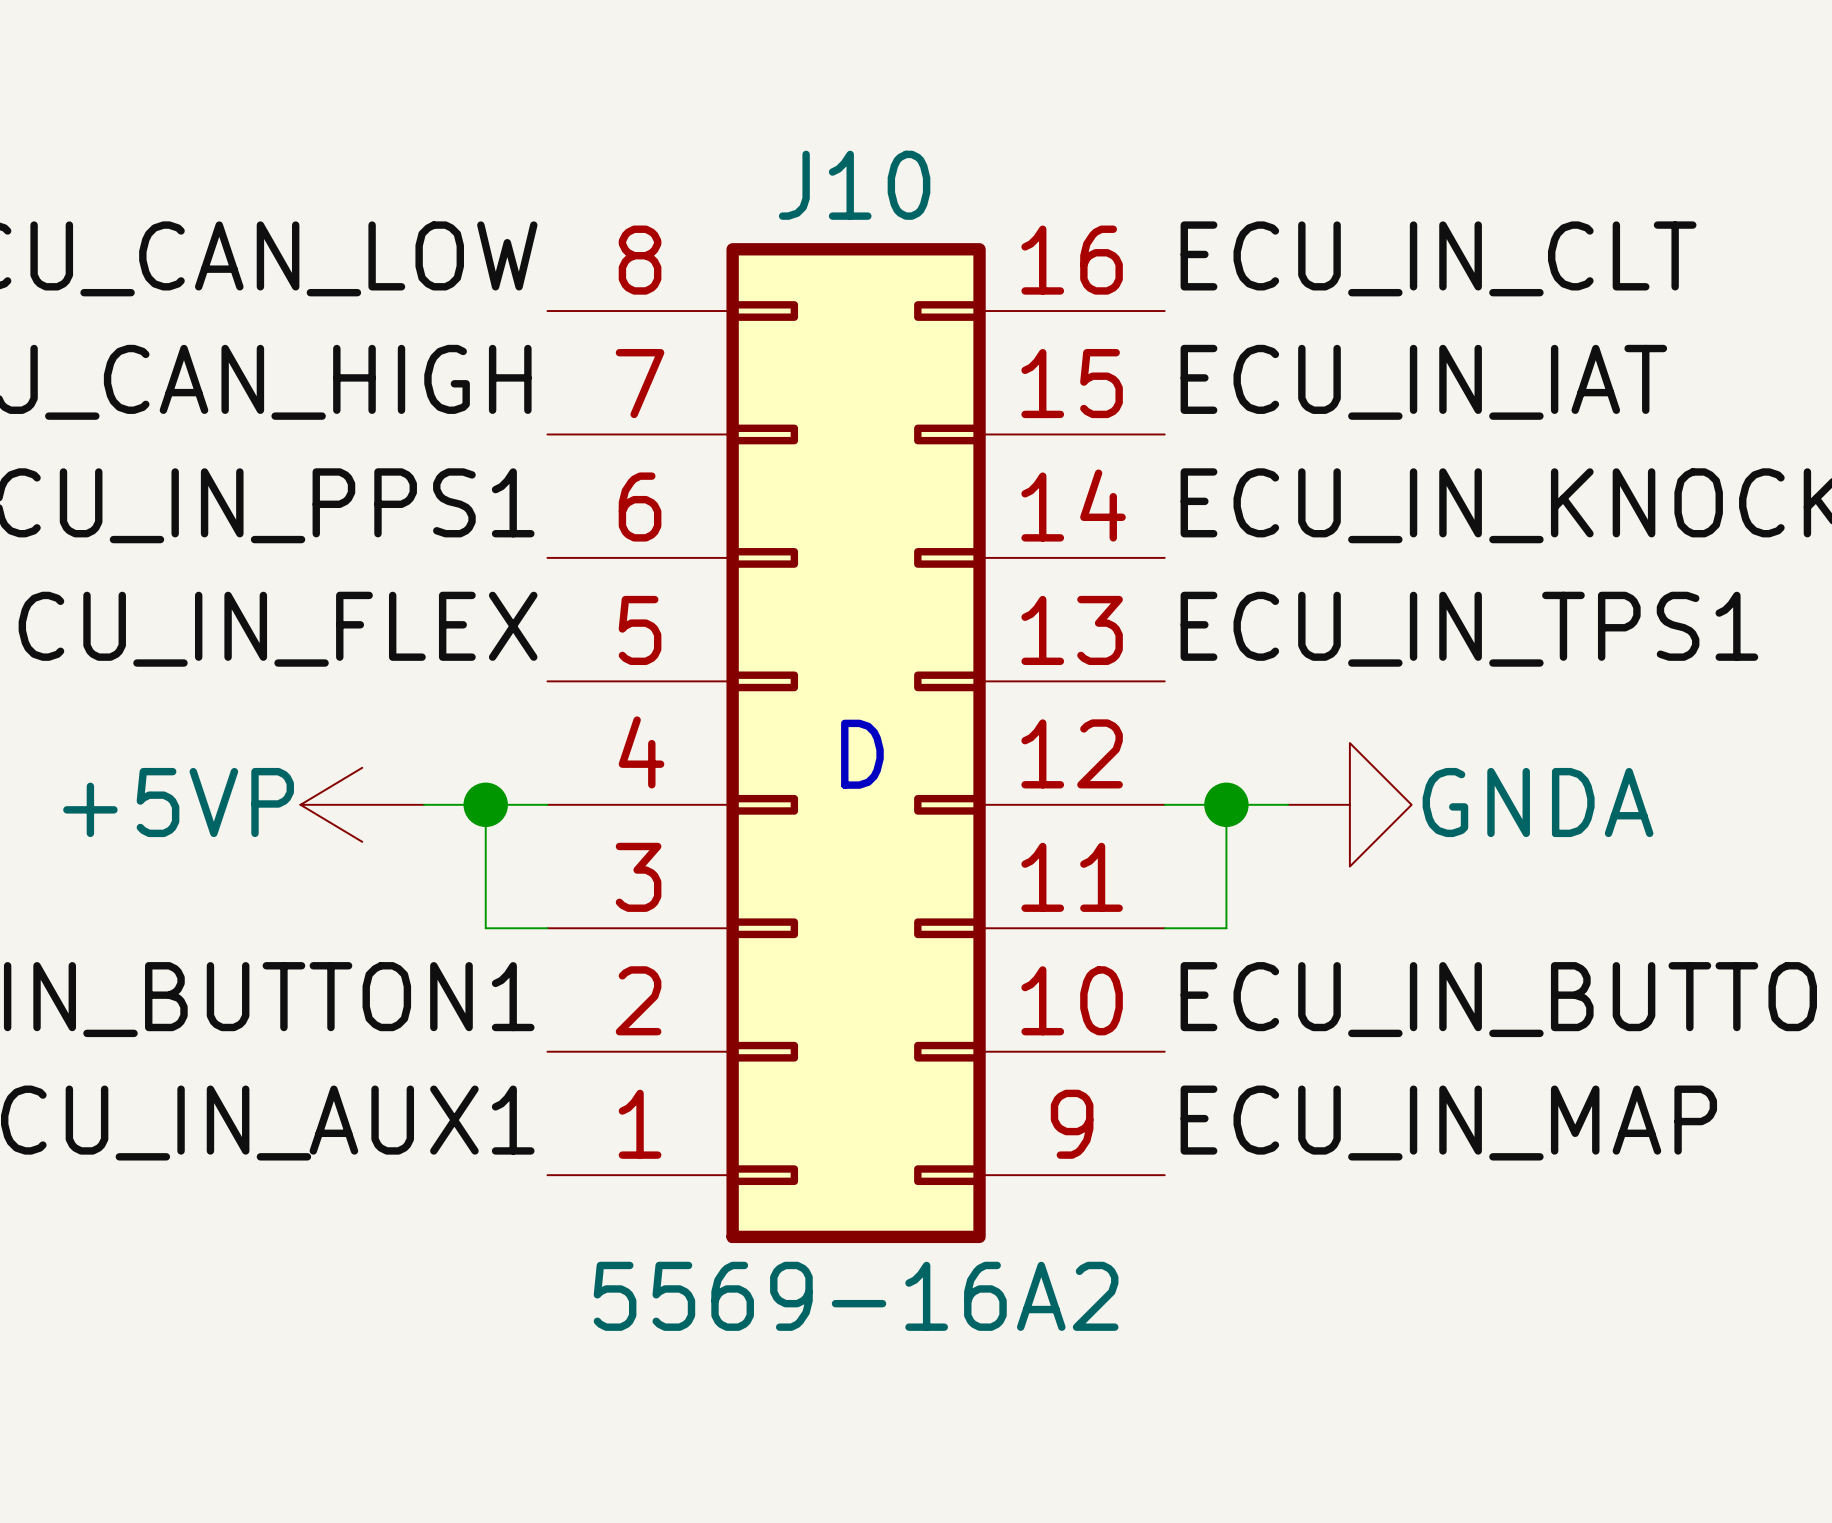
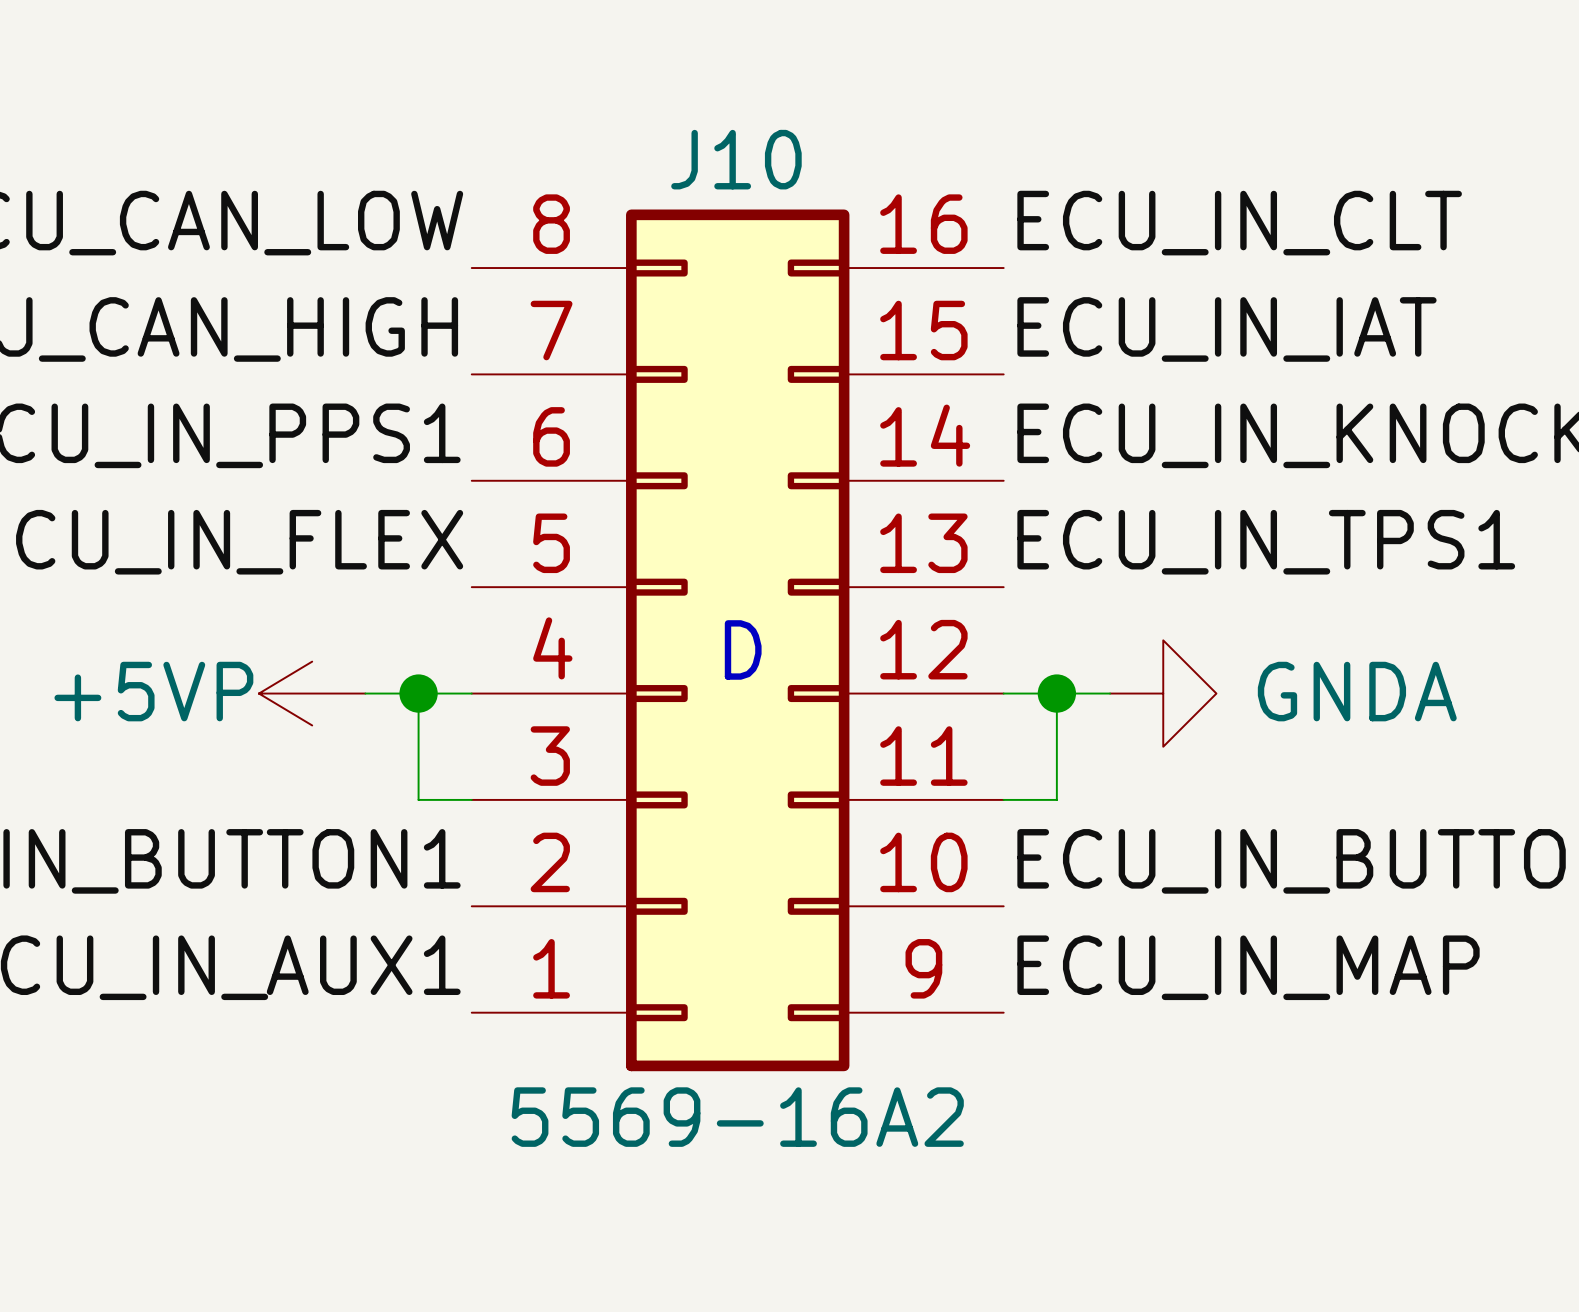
power symbol text position: GNDA (1538, 802) -> GNDA (1357, 691)

